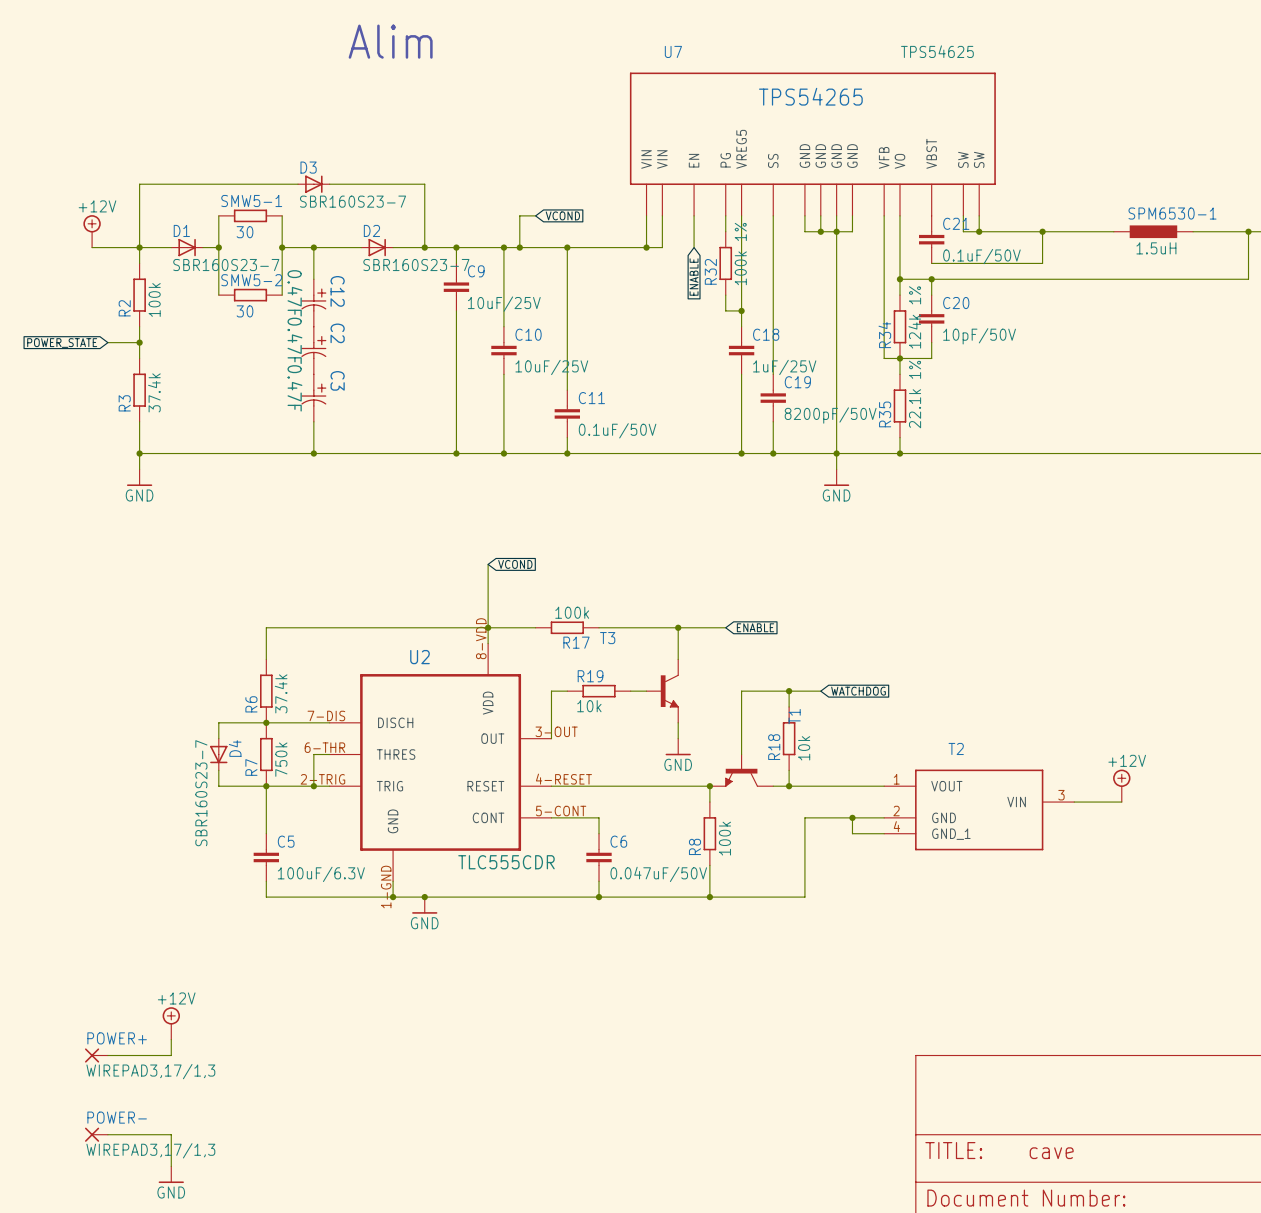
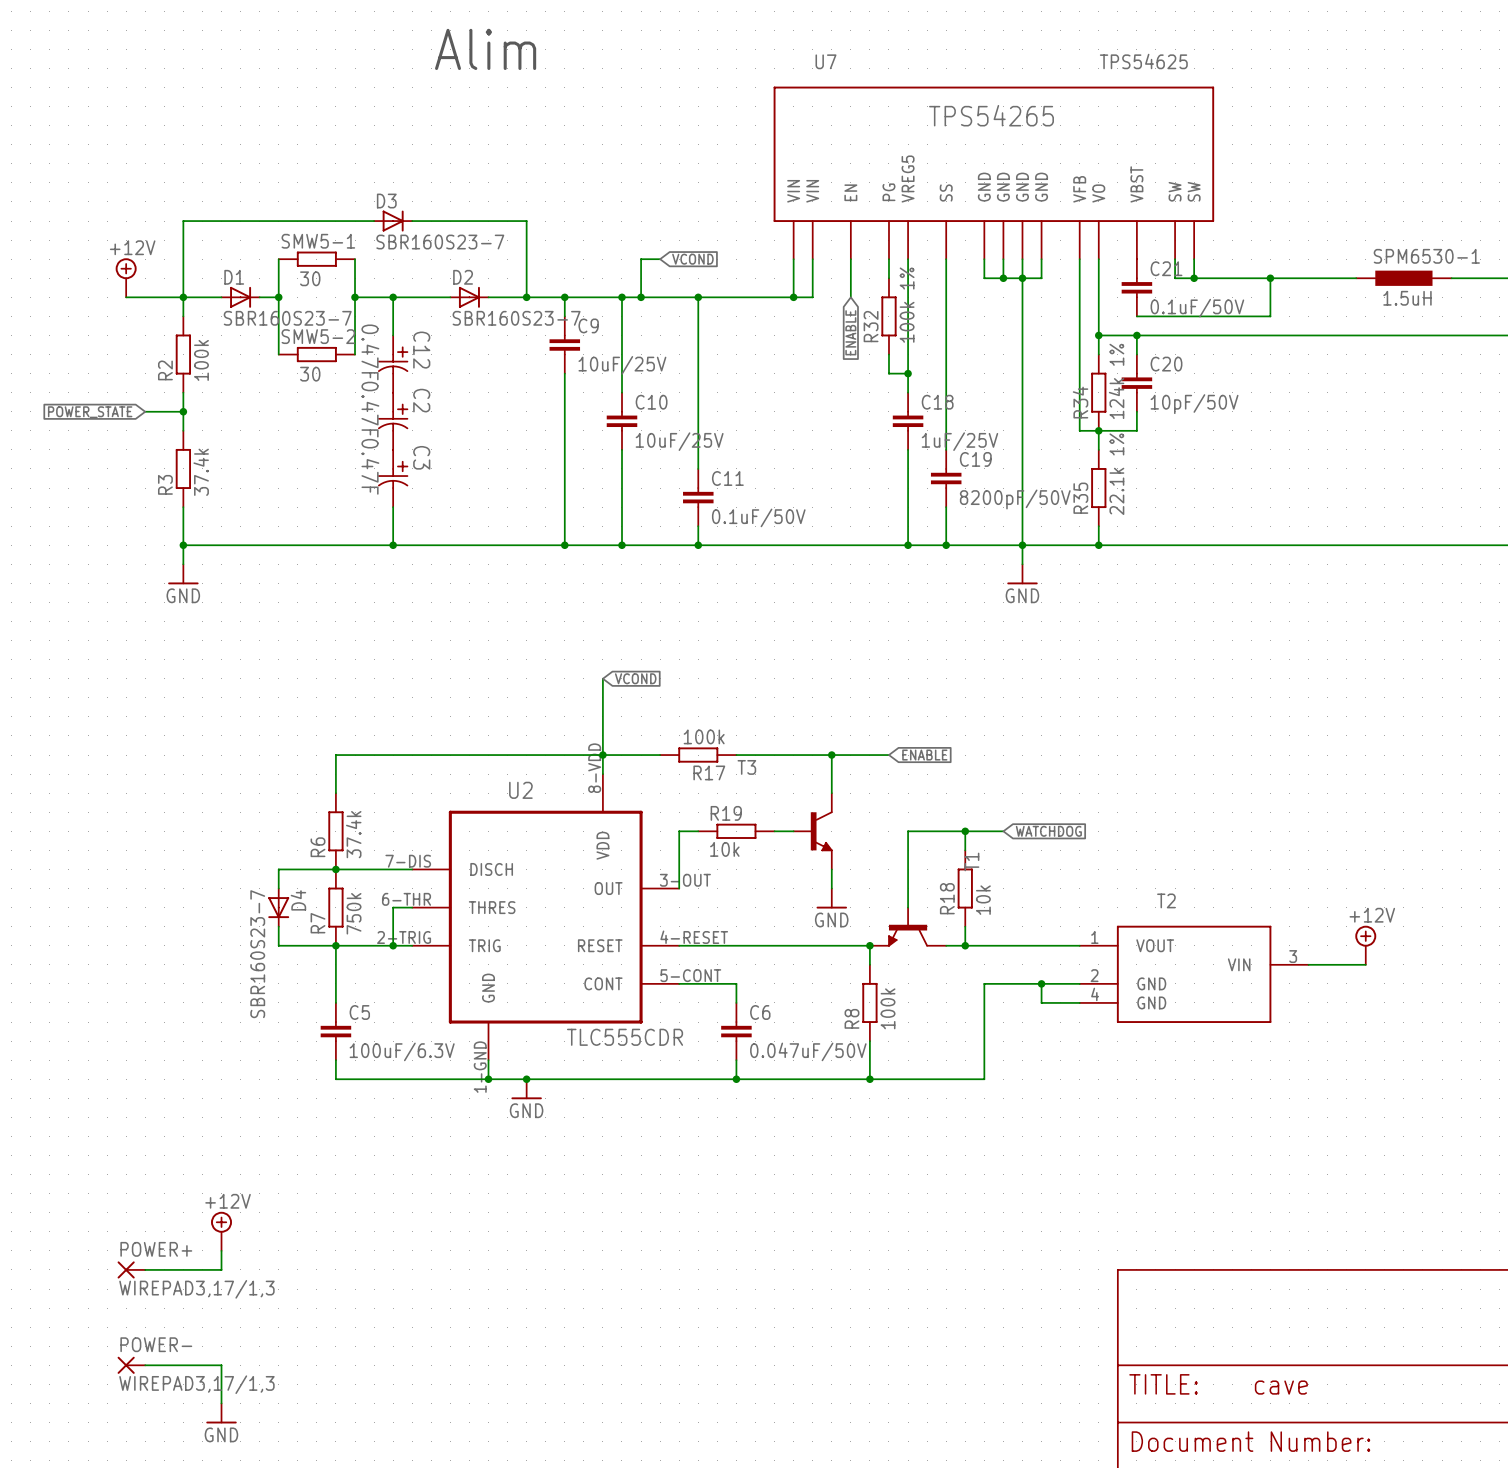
T2 pin name: GND_1 (951, 834) -> GND (1151, 1002)

